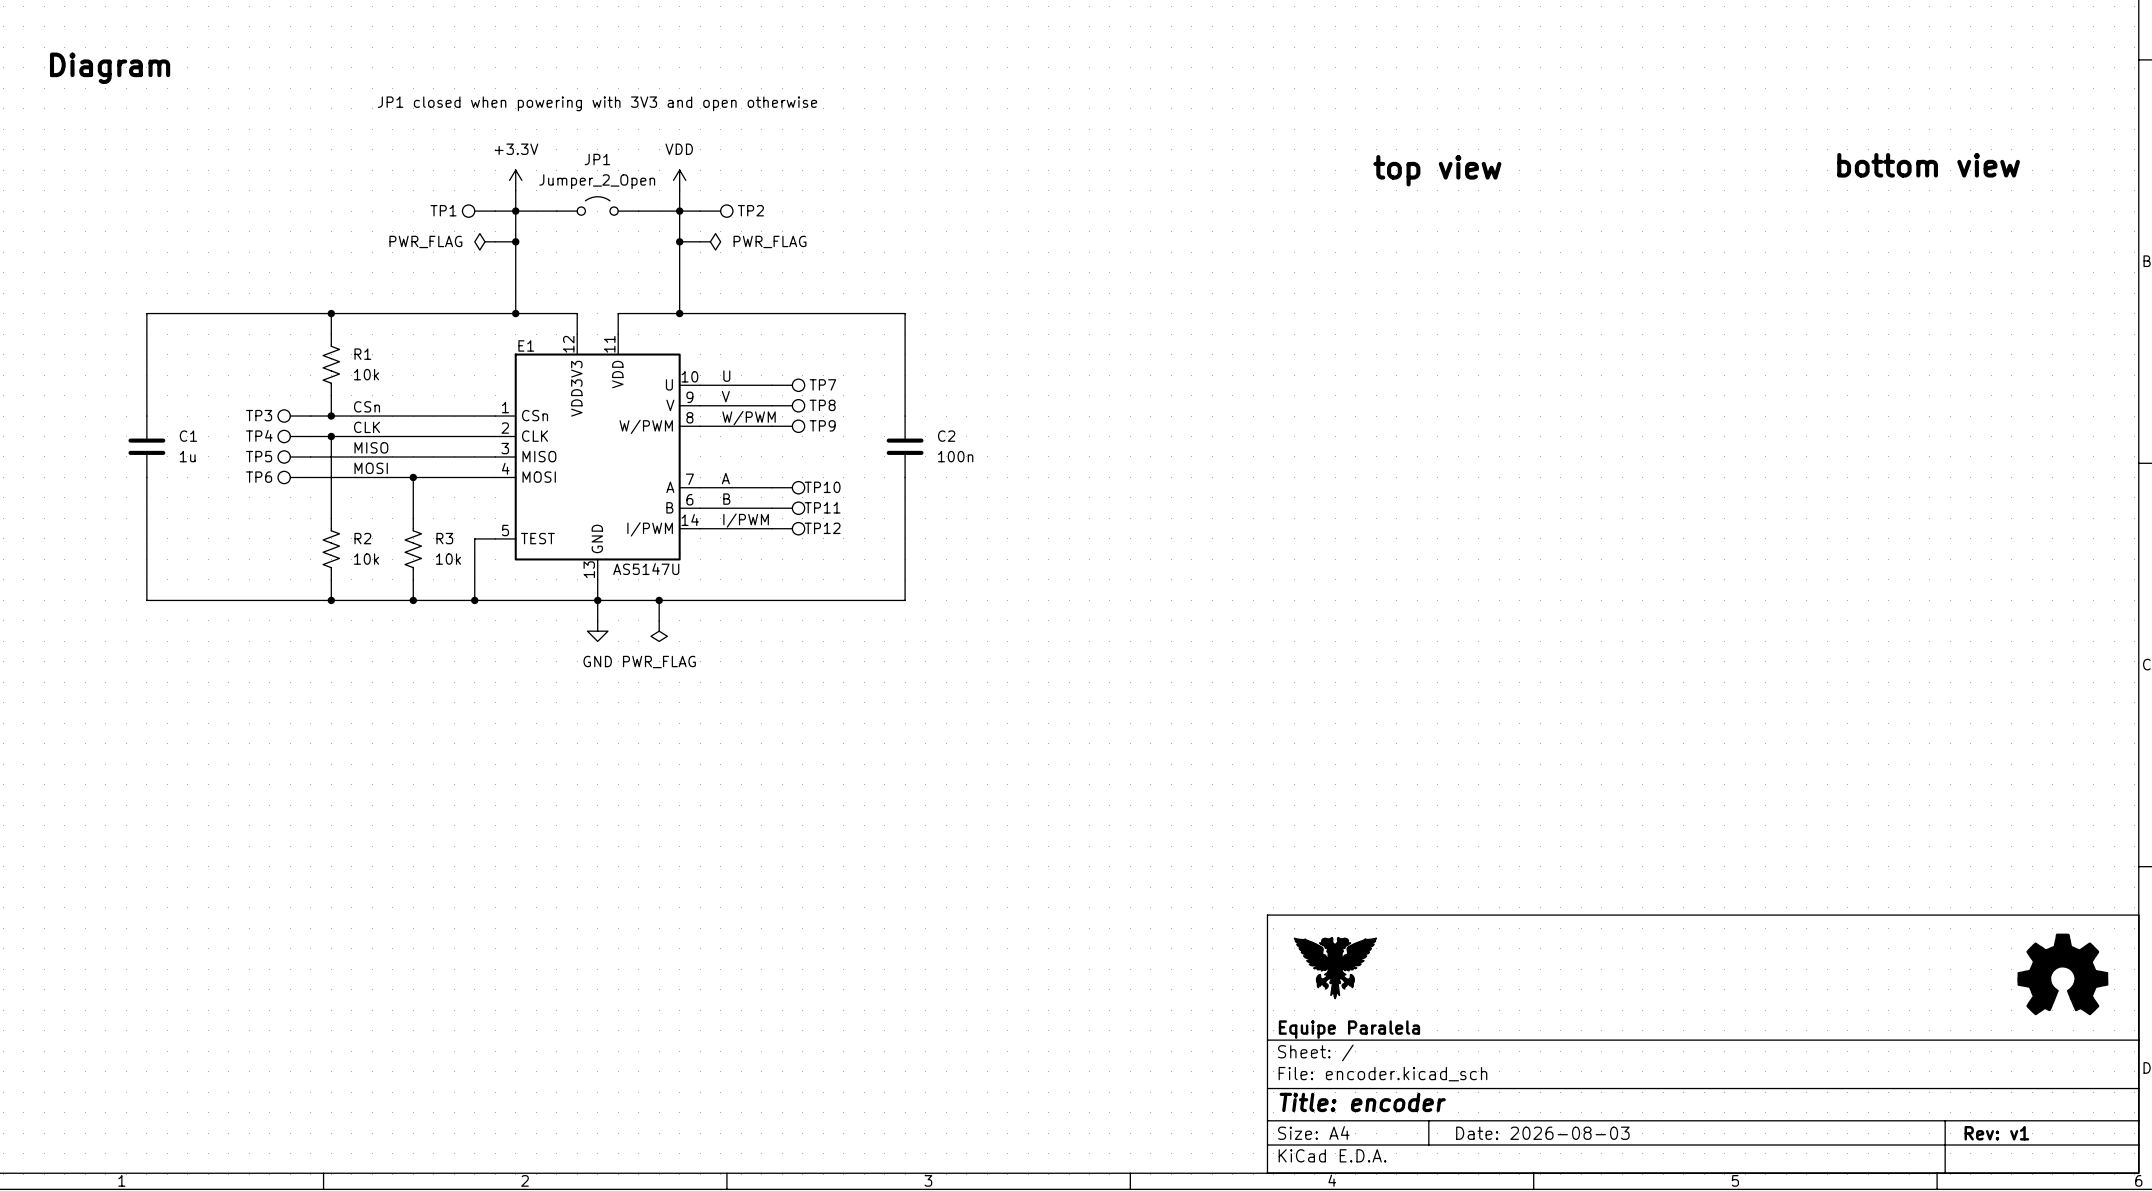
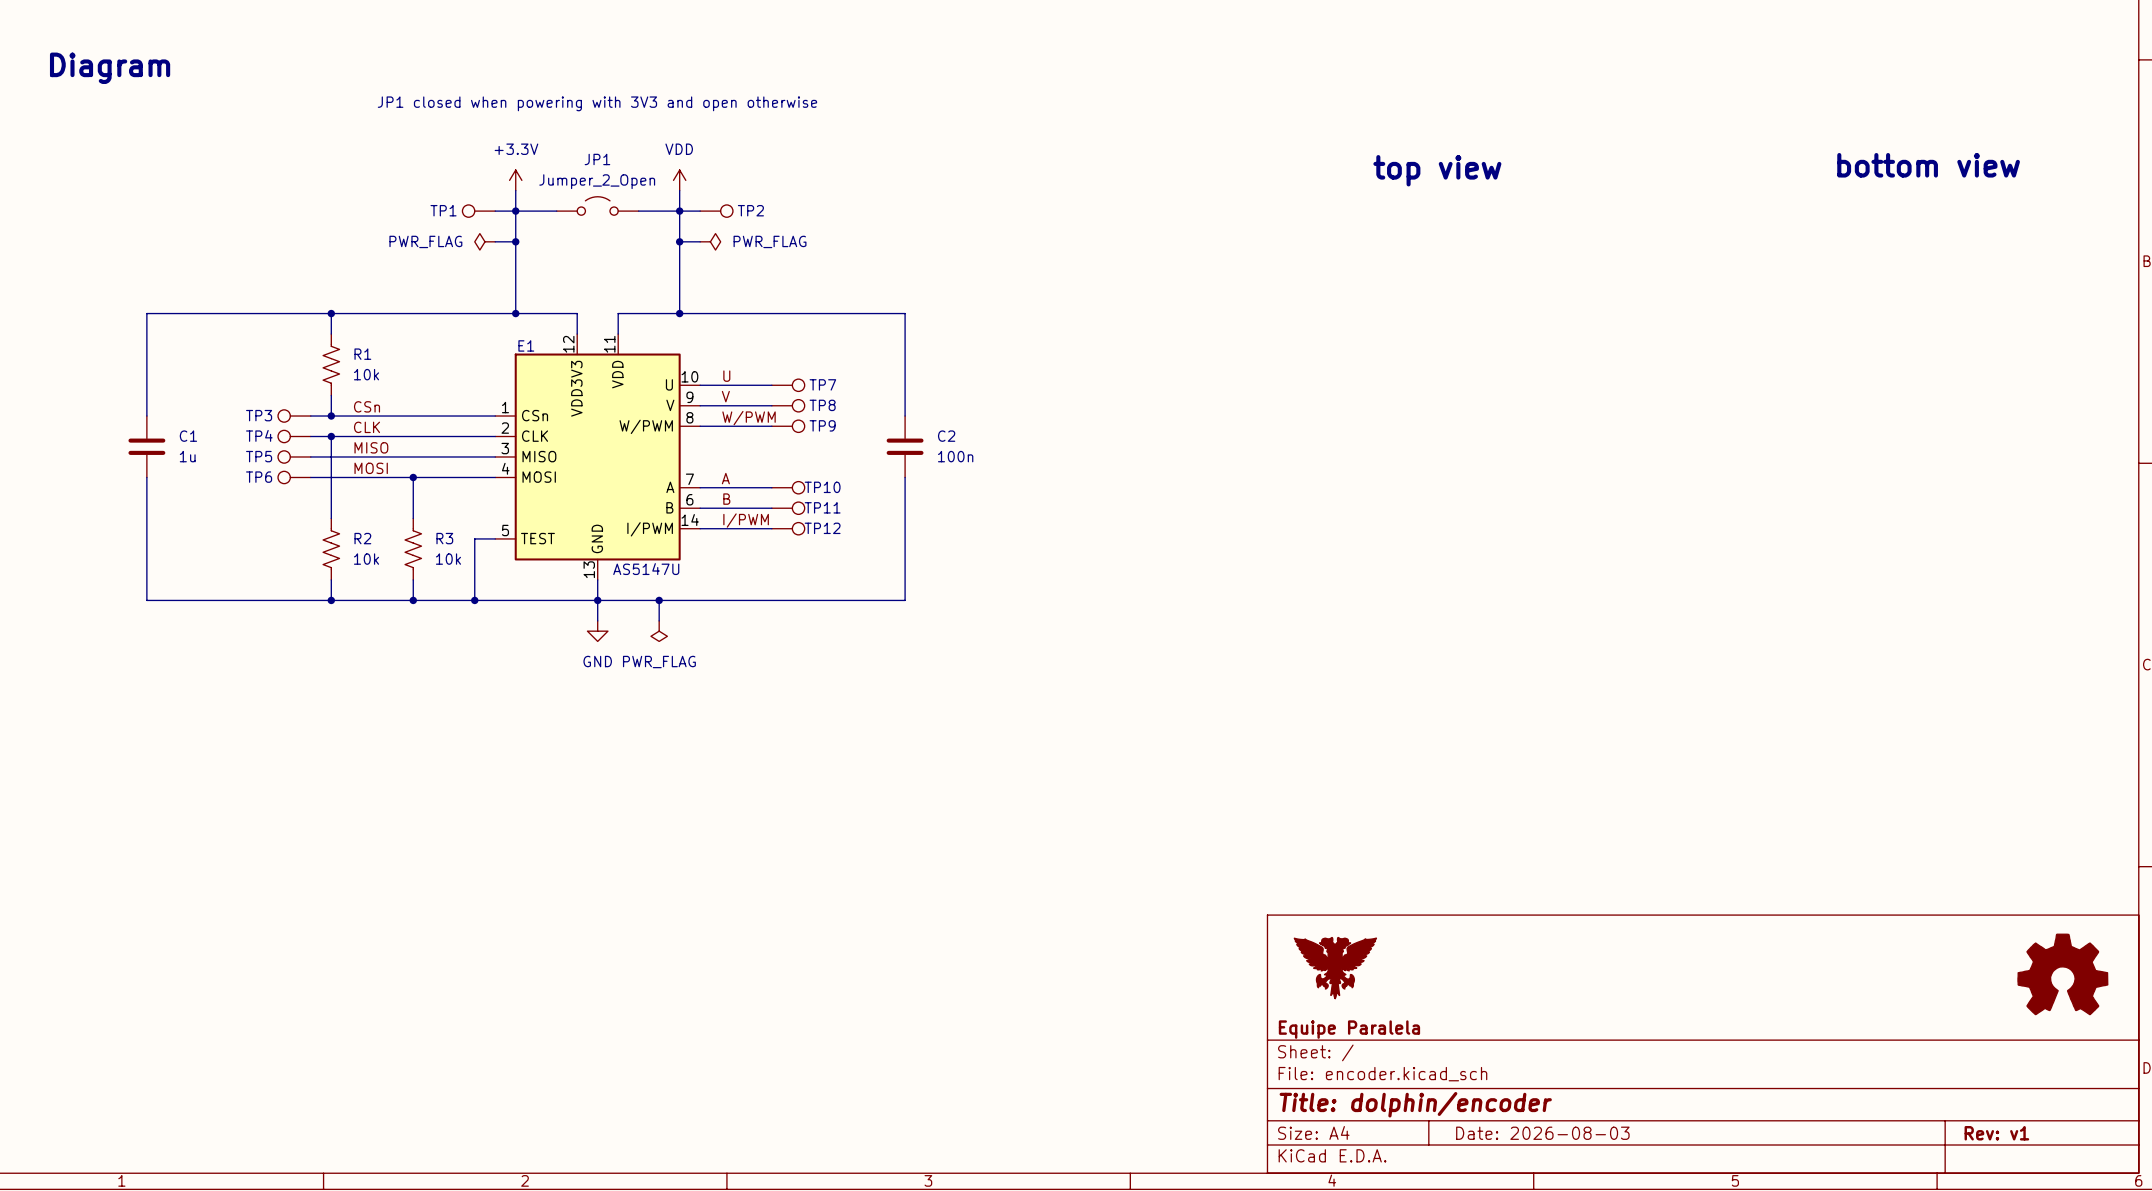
title block: Title: encoder (1362, 1102) -> Title: dolphin/encoder (1415, 1104)

